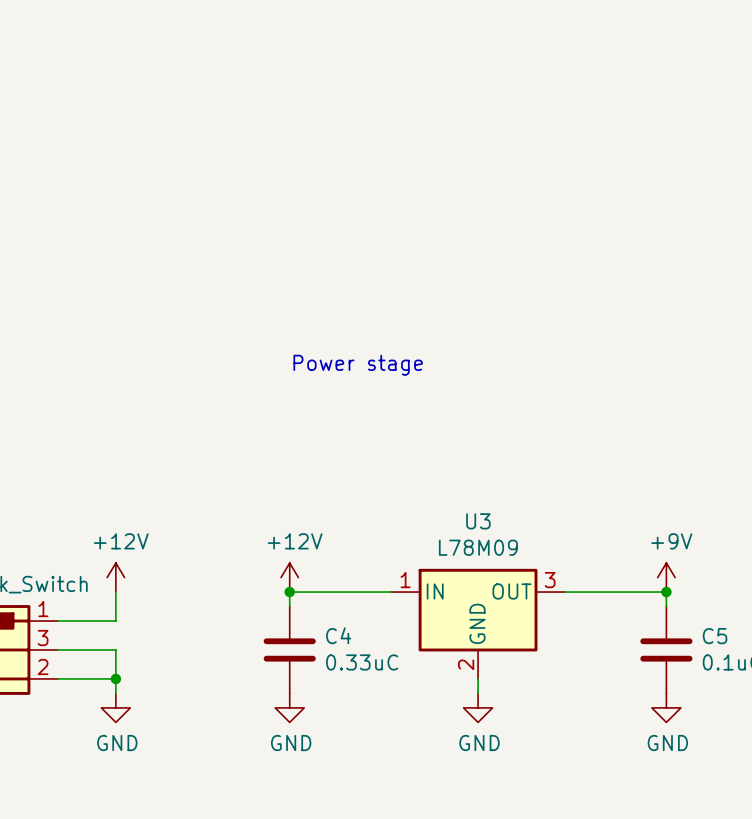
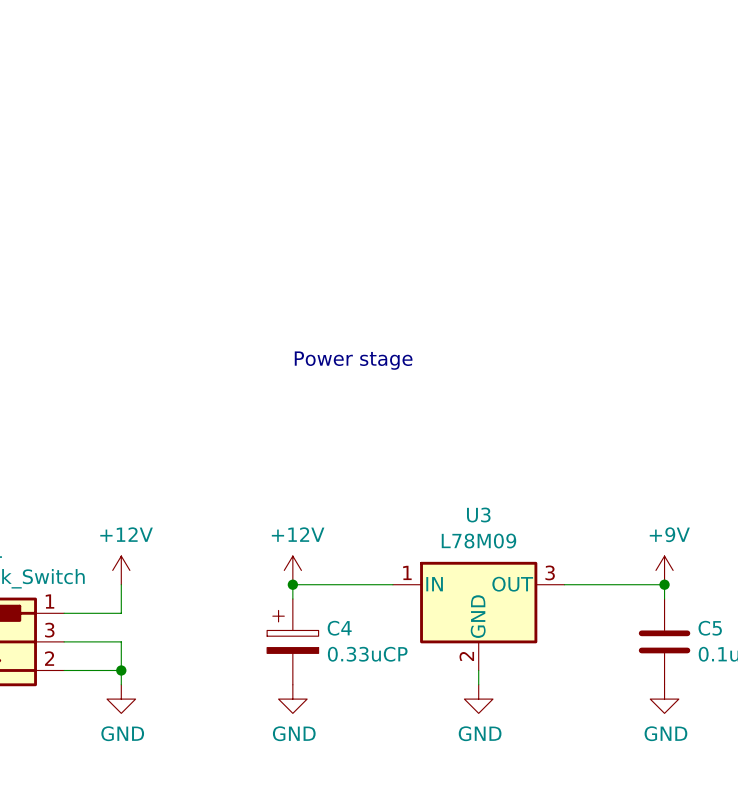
C4 symbol: [263, 606, 316, 694] -> [267, 599, 319, 685]
C4 value: 0.33uC (362, 662) -> 0.33uCP (367, 654)

